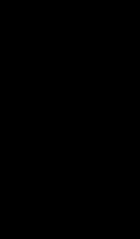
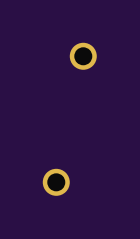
part: none -> (83, 56)
part: none -> (56, 182)

